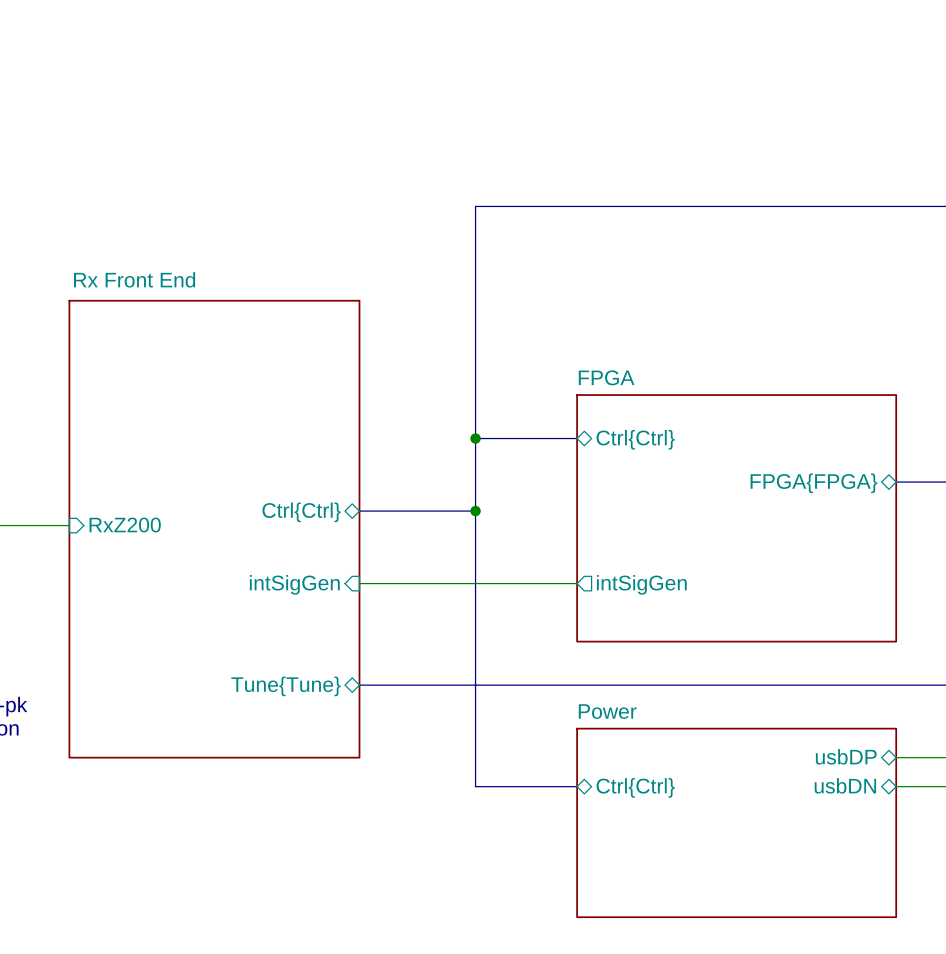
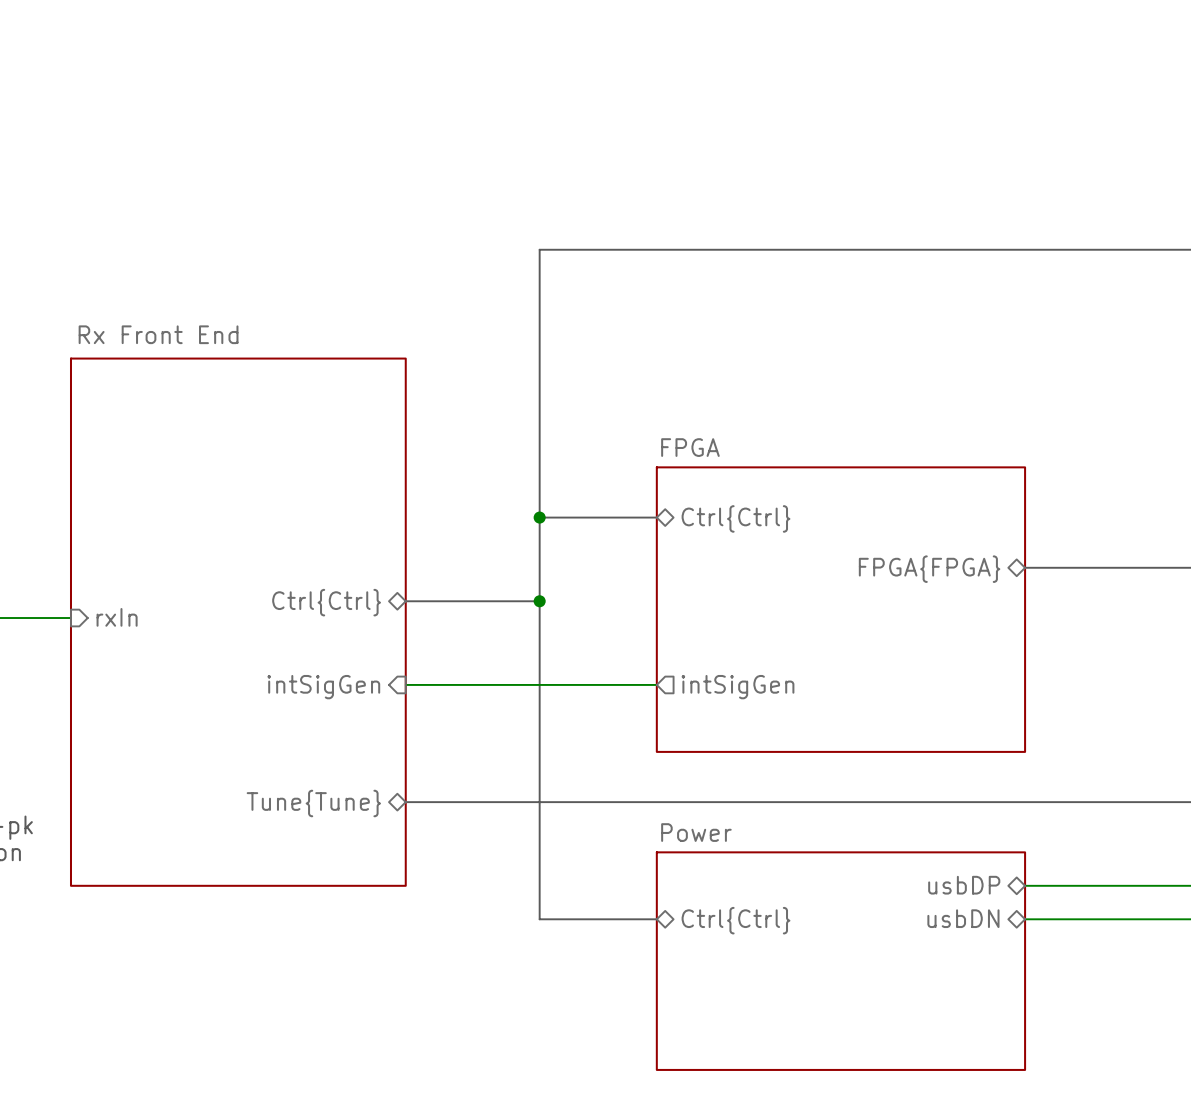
sheet pin: RxZ200 (125, 525) -> rxIn (117, 617)

